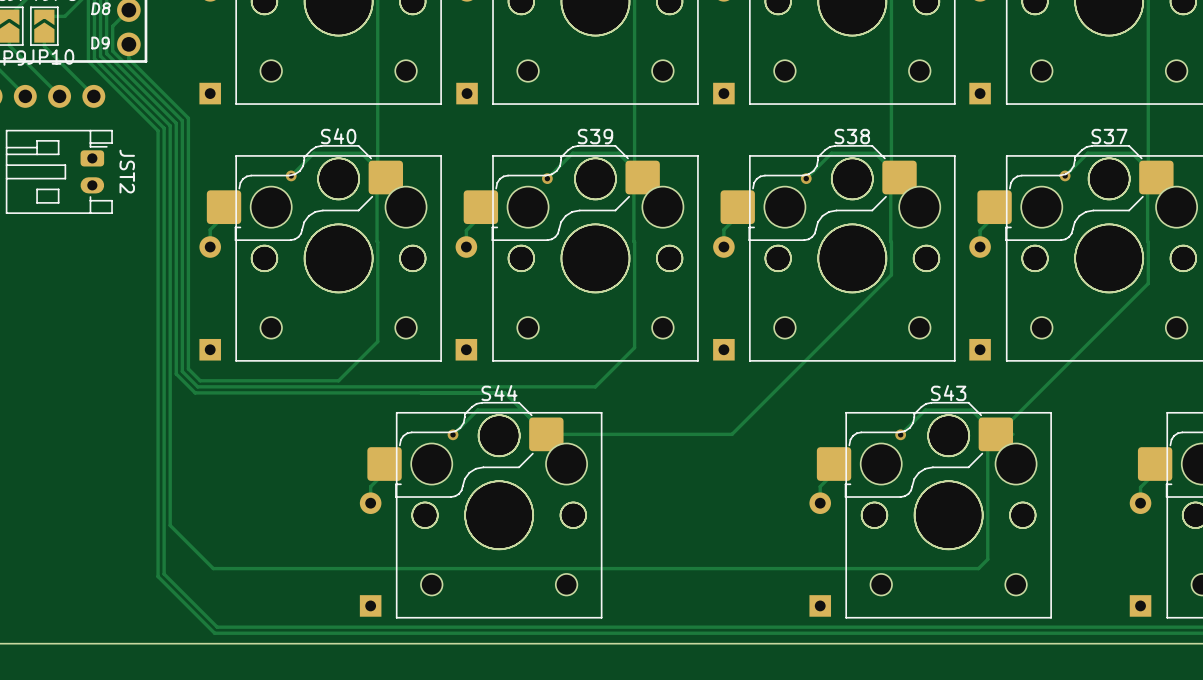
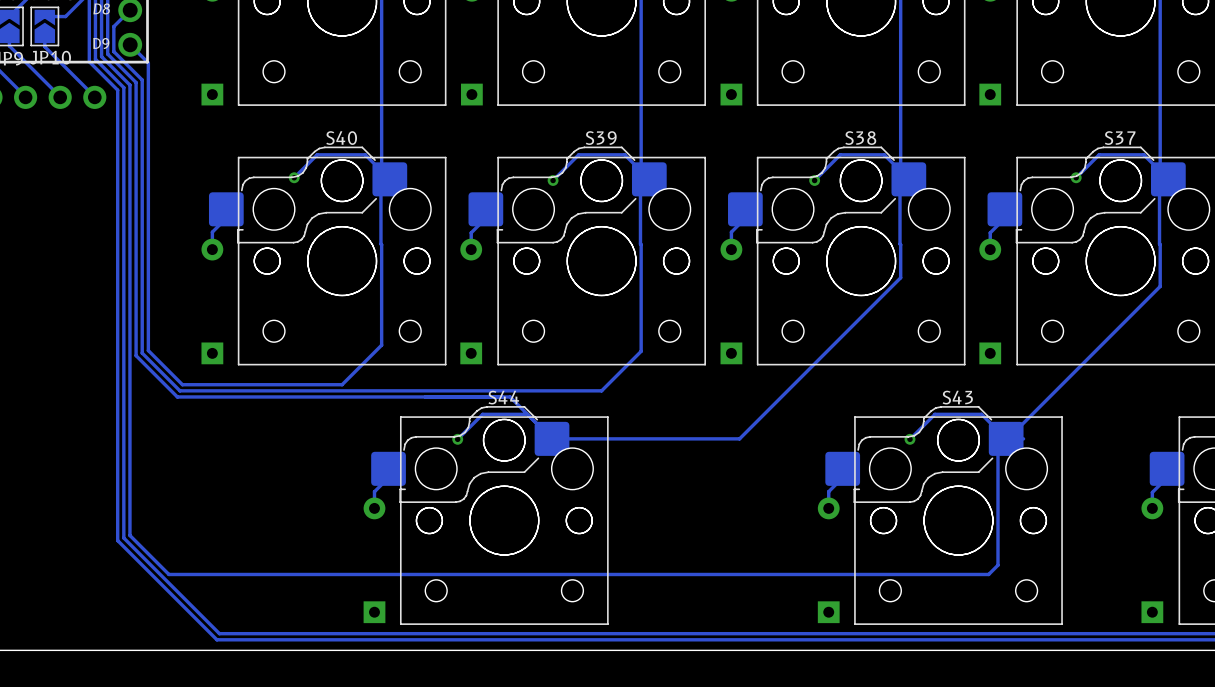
track: (128, 44) (128, 58) (188, 118) (188, 368) (200, 380) -> (130, 44) (148, 62) (148, 350) (182, 384) (202, 384)
track: (140, 79) (182, 120) (182, 371) (197, 386) -> (142, 79) (142, 353) (179, 390) (199, 390)
track: (134, 81) (176, 123) (176, 373) (195, 392) -> (136, 82) (136, 355) (177, 396) (197, 396)
track: (128, 84) (170, 125) (170, 525) (213, 568) -> (129, 85) (129, 535) (168, 574) (215, 574)
track: (122, 86) (164, 128) (164, 574) -> (123, 87) (123, 538) (165, 580)
track: (116, 89) (158, 130) (158, 576) -> (117, 90) (117, 540) (159, 582)
JST2: (59, 171) -> none

